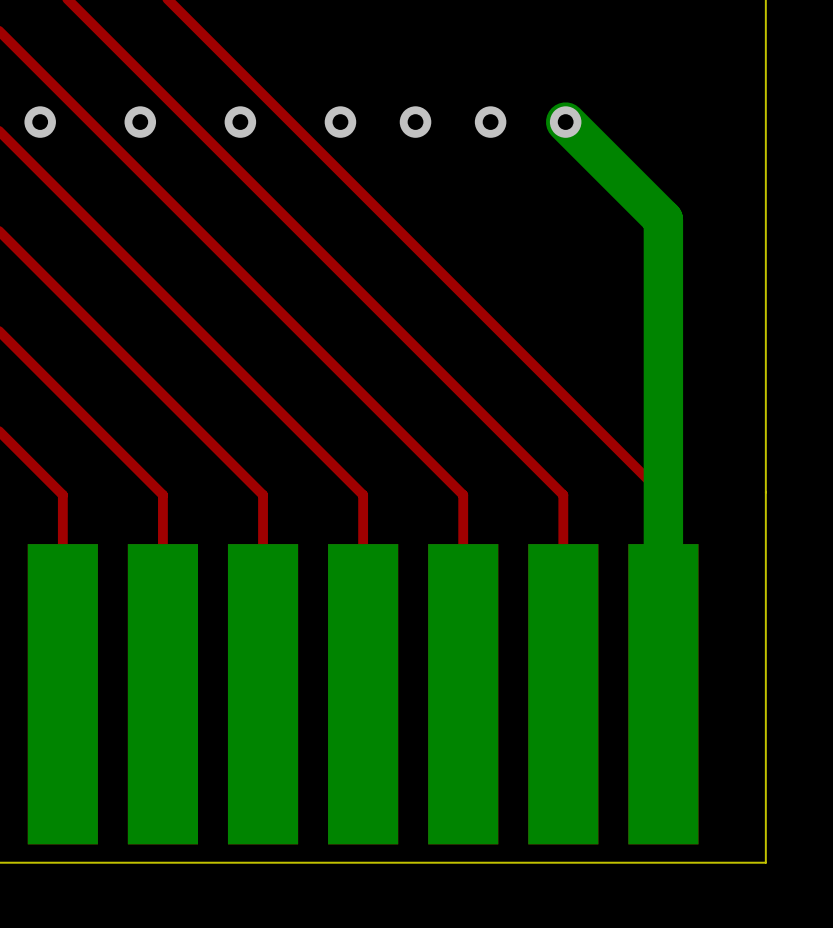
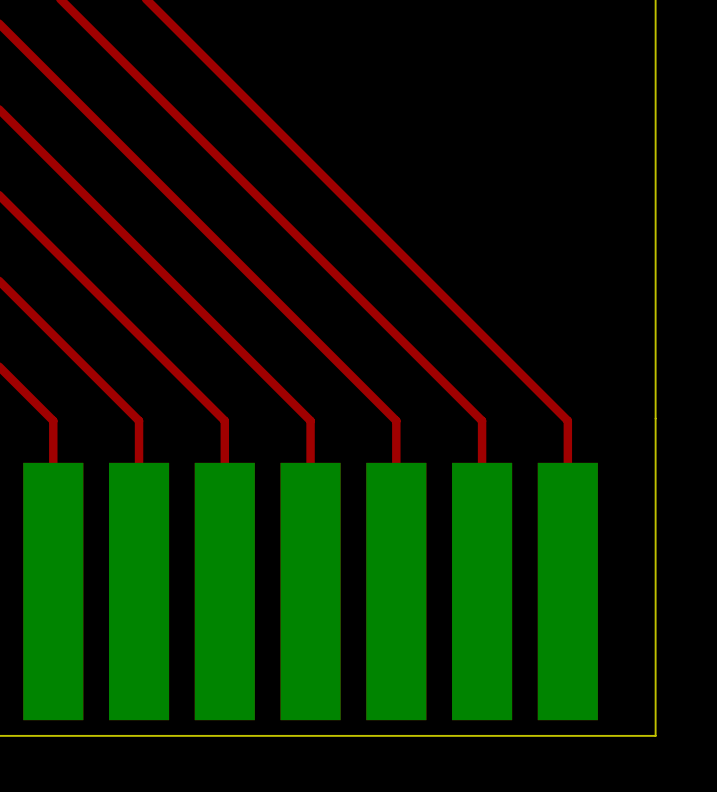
via: (40, 122) -> none
via: (140, 122) -> none
via: (240, 122) -> none
via: (340, 122) -> none
via: (415, 122) -> none
via: (490, 122) -> none
bottom track: (565, 122) (663, 219) (663, 694) -> none
via: (565, 122) -> none

